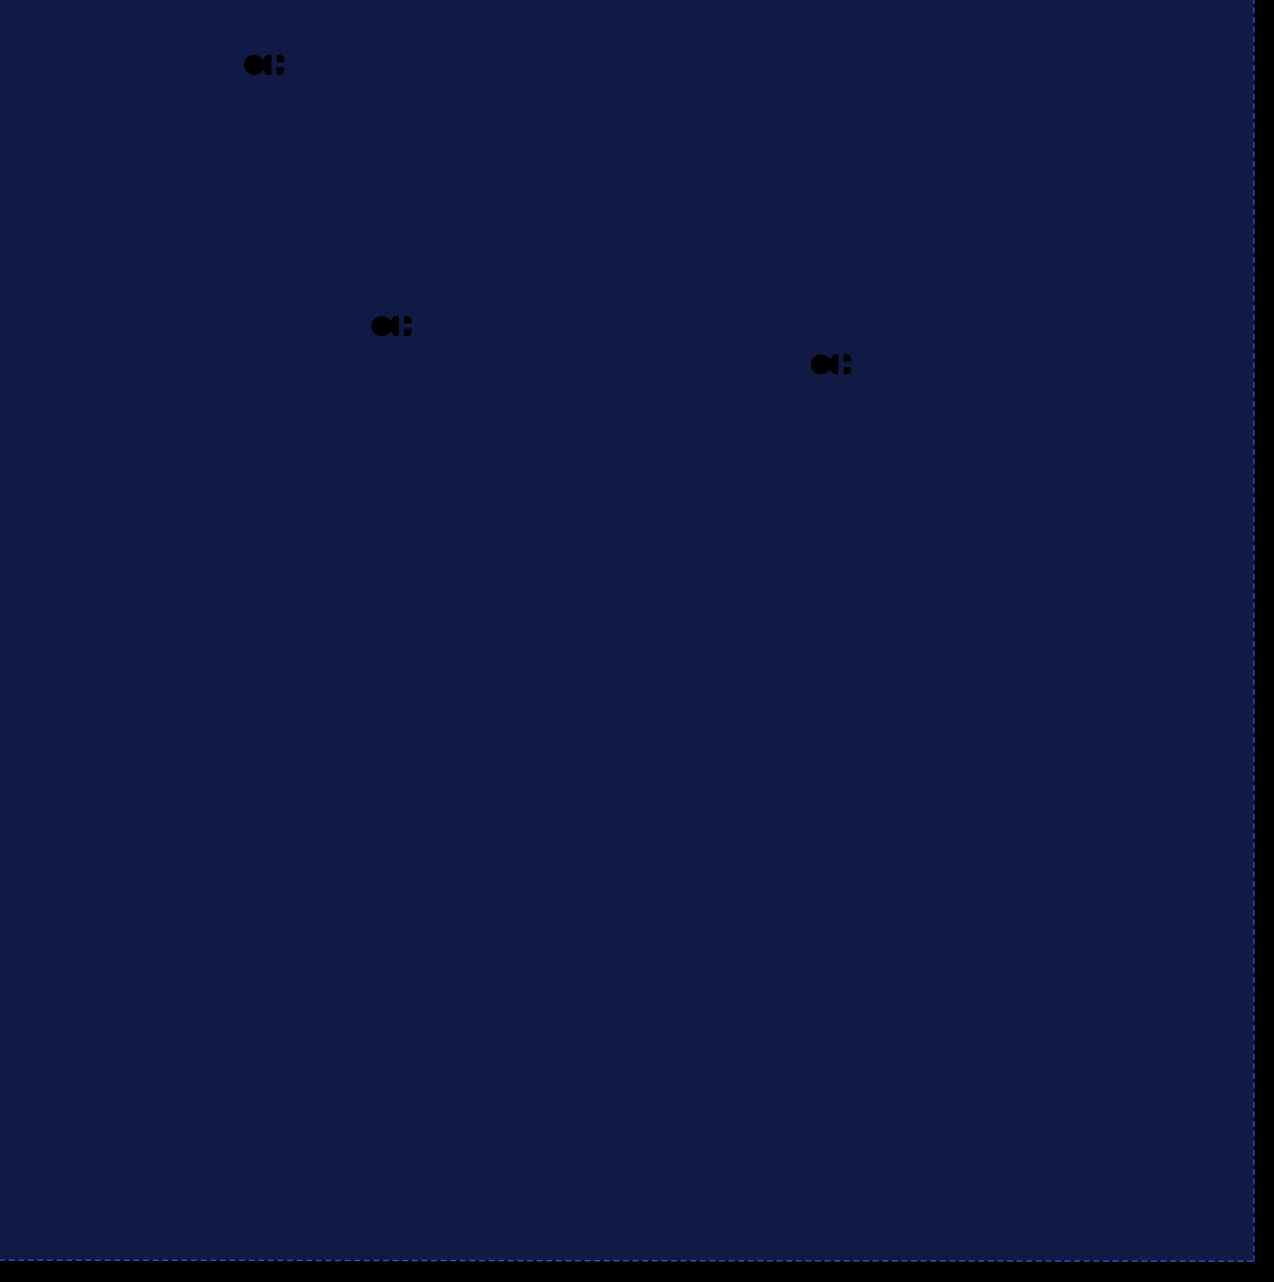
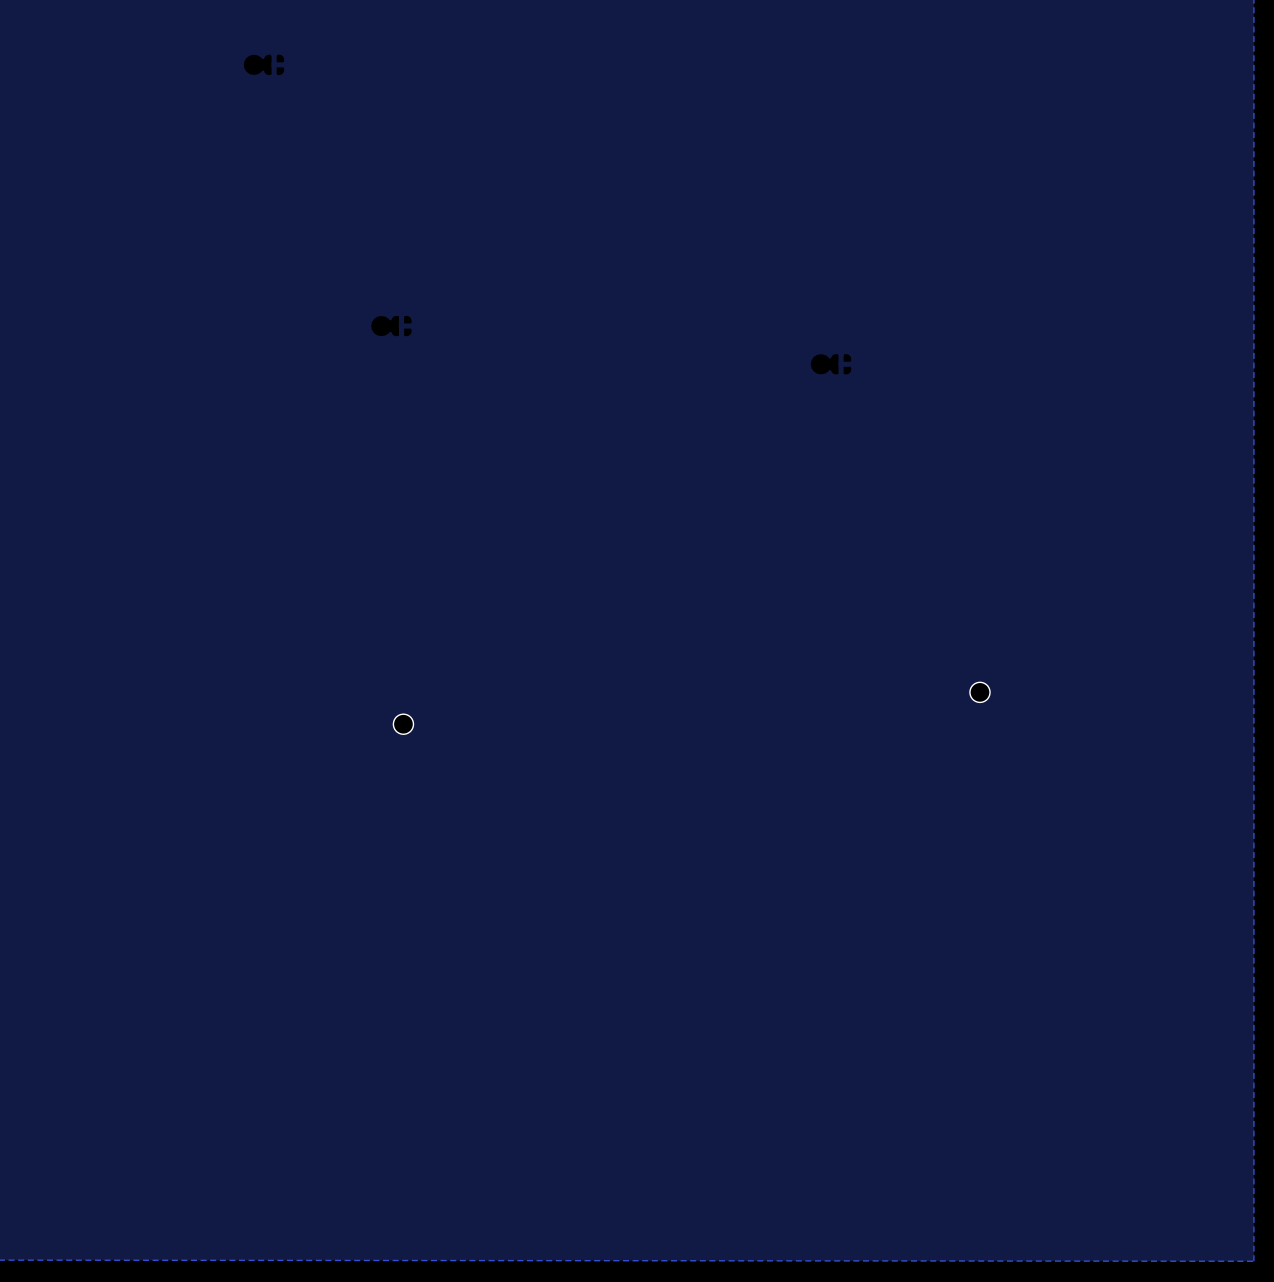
part: none -> (979, 692)
part: none -> (403, 724)

